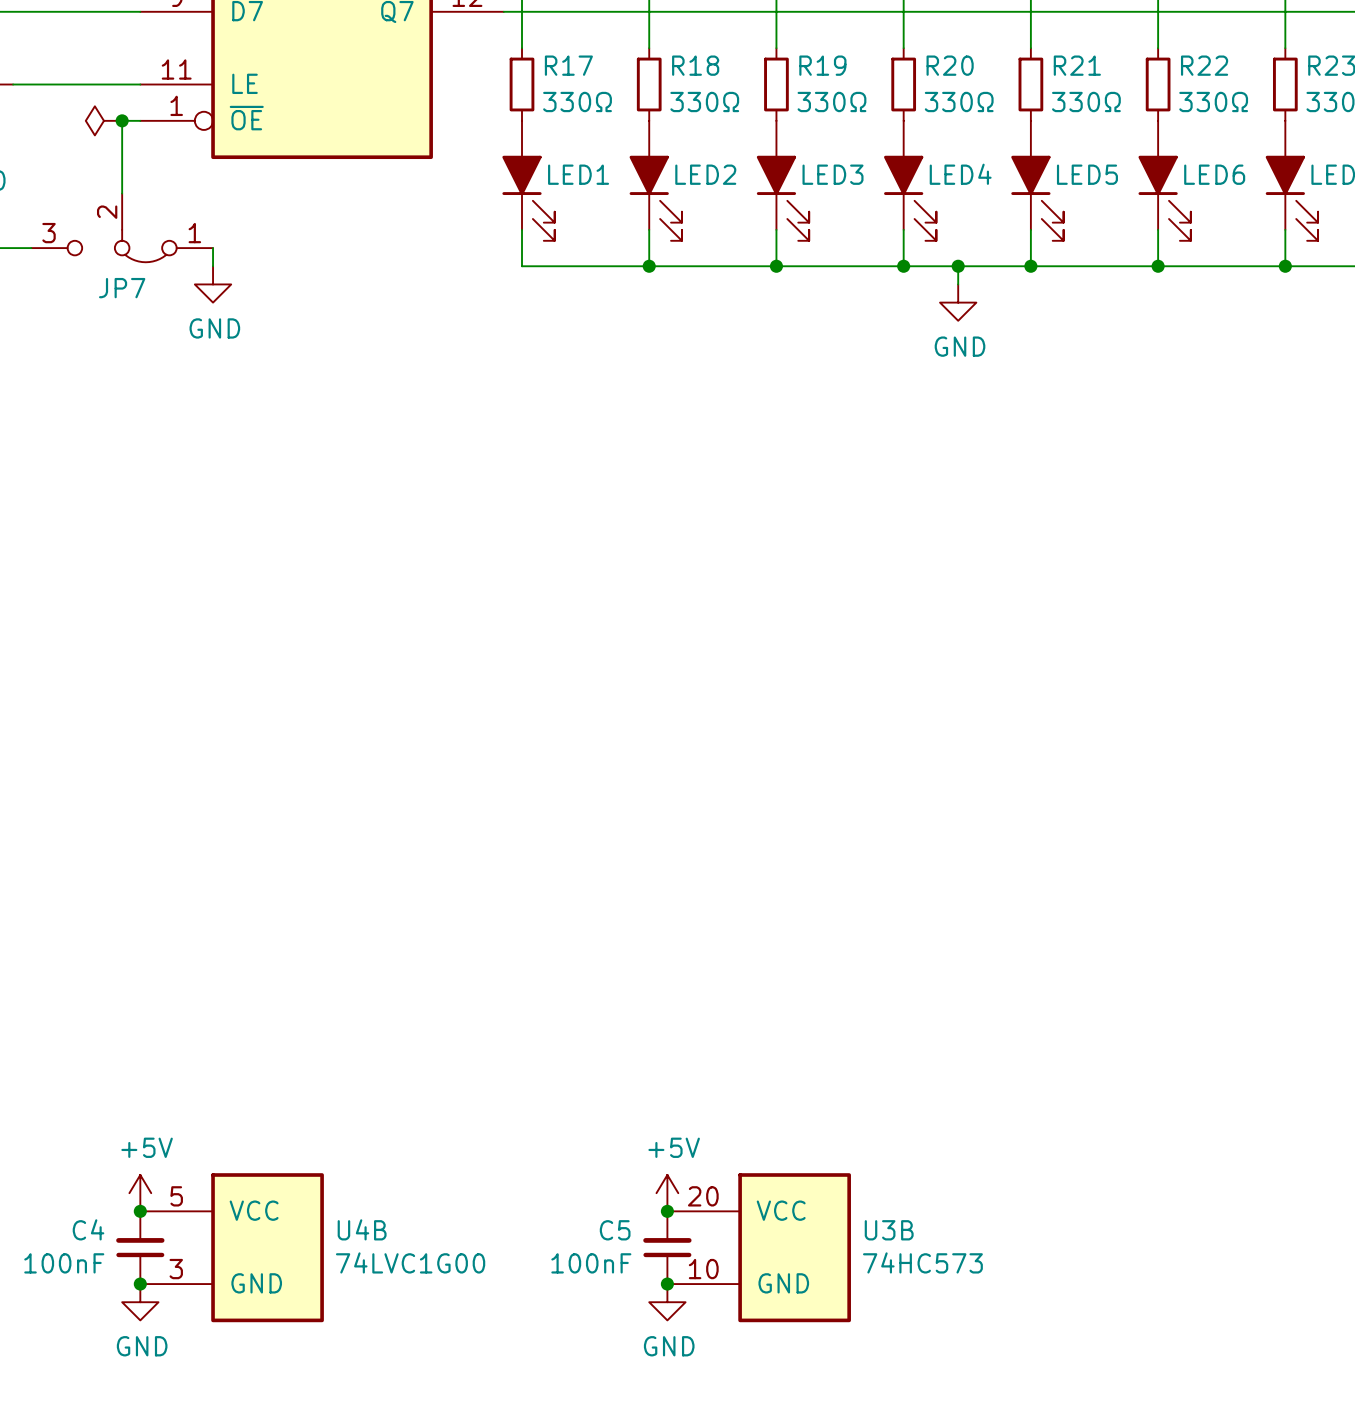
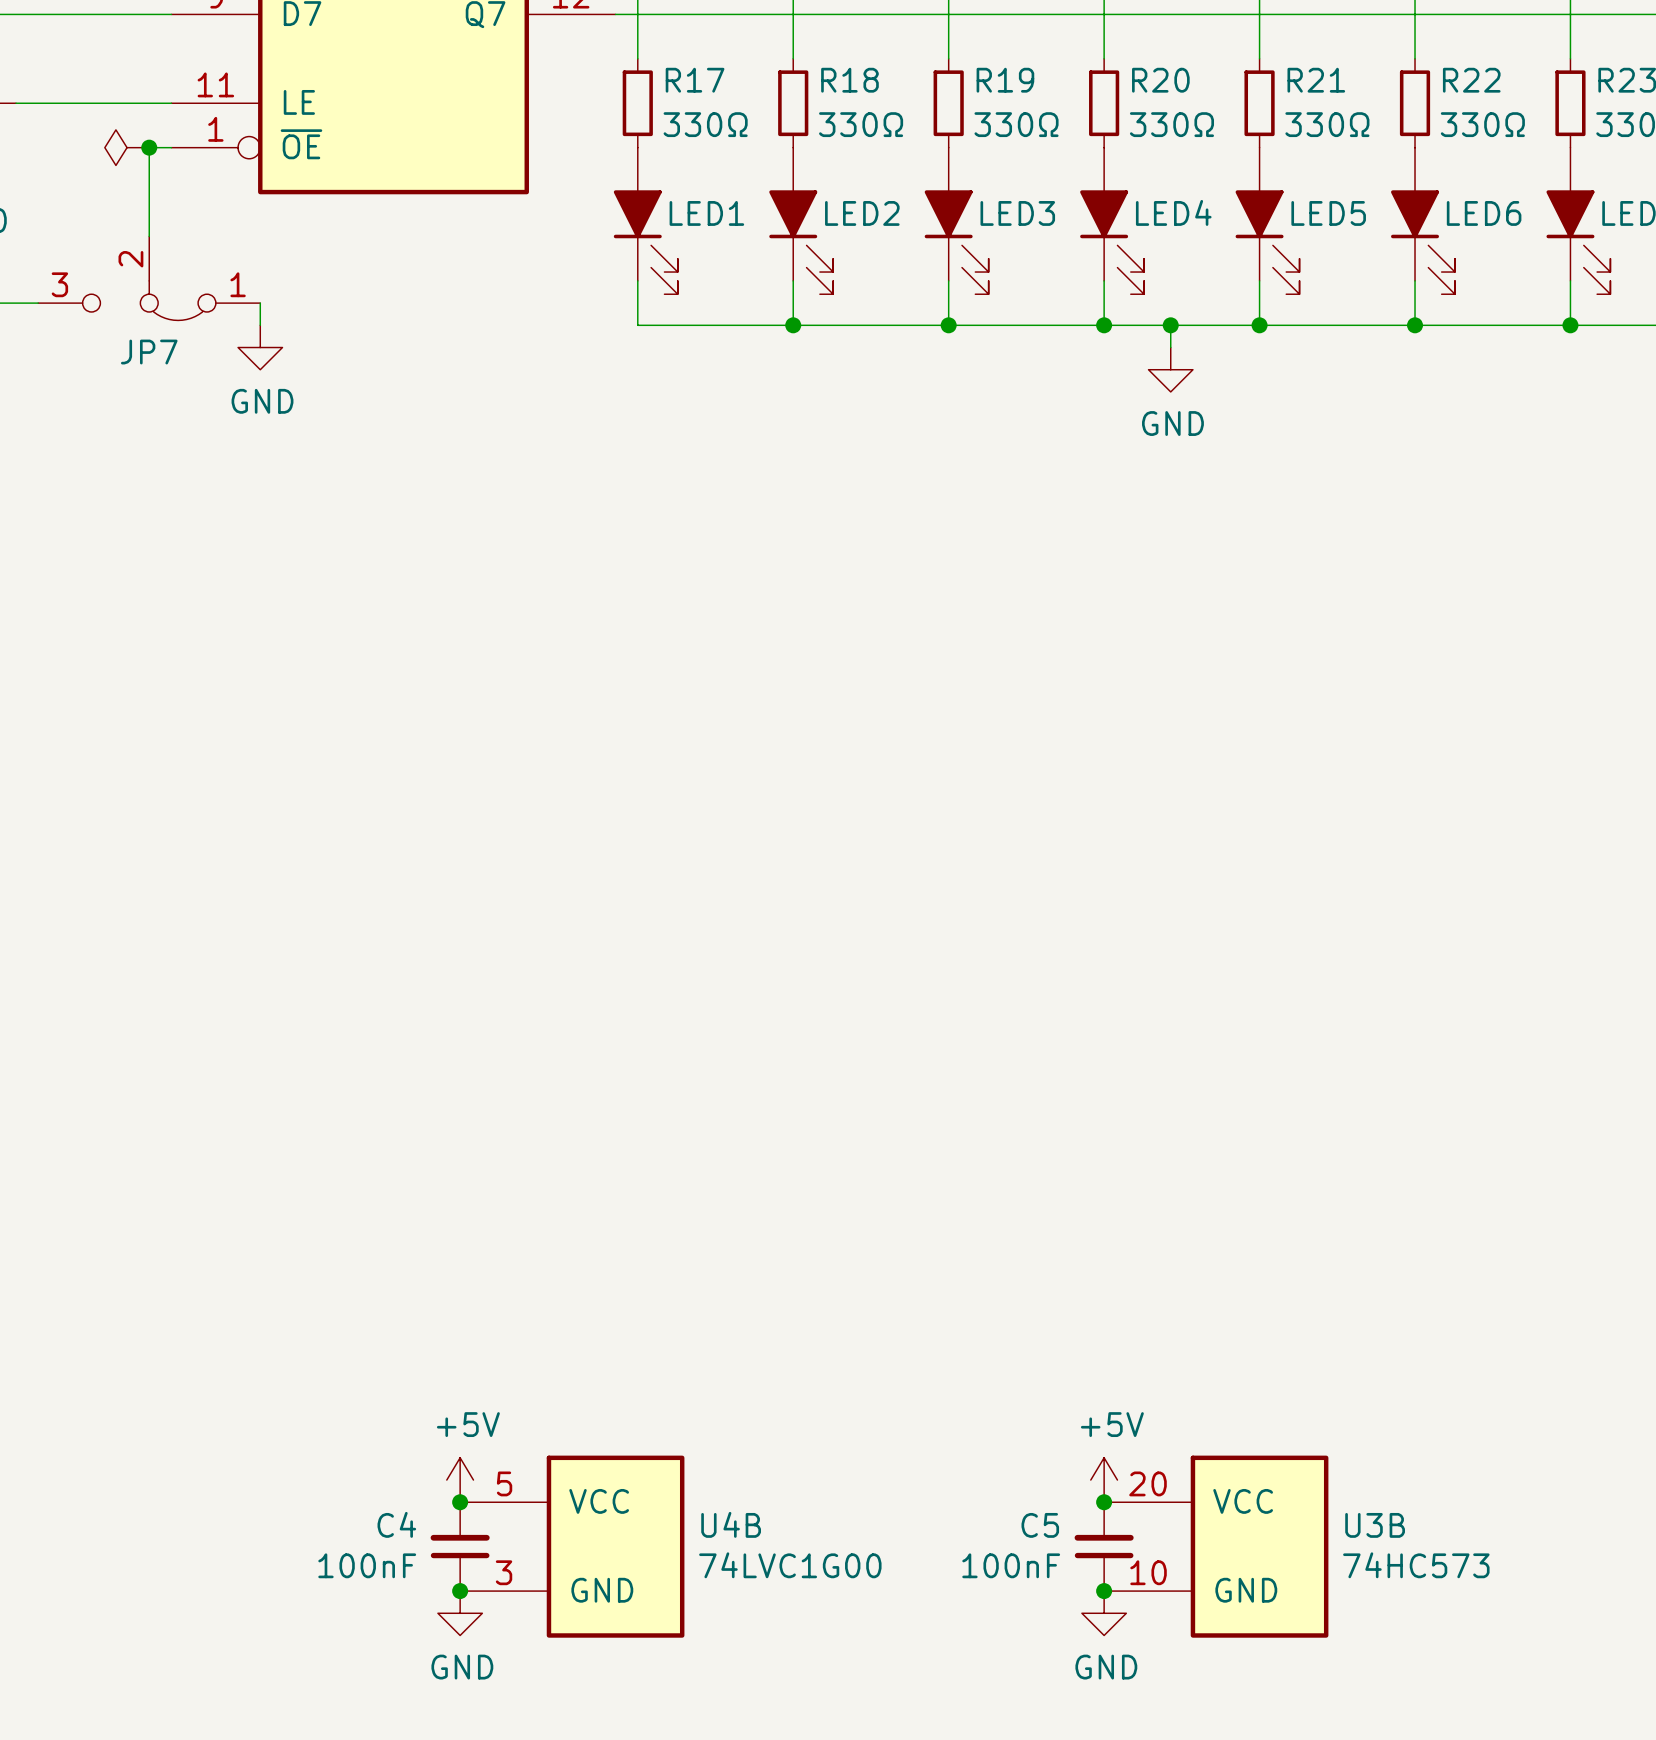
power symbol: +5V (140, 1193) -> none
power symbol: +5V (667, 1193) -> none
junction: (140, 1211) -> none
power symbol: none -> +5V (460, 1480)
junction: (667, 1211) -> none
power symbol: none -> +5V (1104, 1480)
junction: none -> (460, 1502)
junction: none -> (1104, 1502)
C4 position: (140, 1247) -> (460, 1546)
U4B position: (232, 1247) -> (572, 1546)
C5 position: (667, 1247) -> (1104, 1546)
U3B position: (759, 1247) -> (1216, 1546)
junction: (140, 1284) -> none
junction: (667, 1284) -> none
power symbol: GND (140, 1302) -> none
junction: none -> (460, 1591)
power symbol: GND (667, 1302) -> none
junction: none -> (1104, 1591)
power symbol: none -> GND (460, 1613)
power symbol: none -> GND (1104, 1613)

